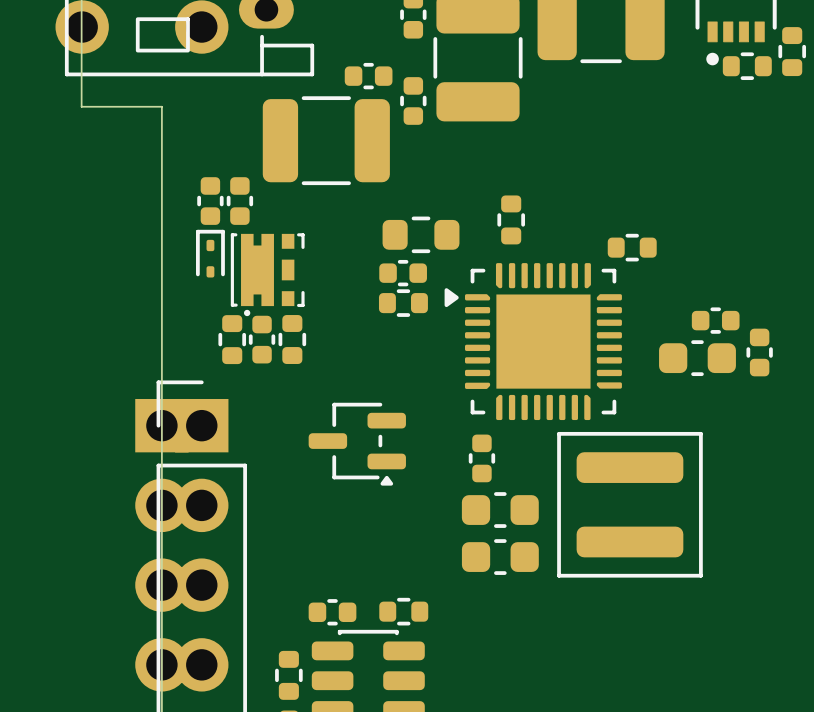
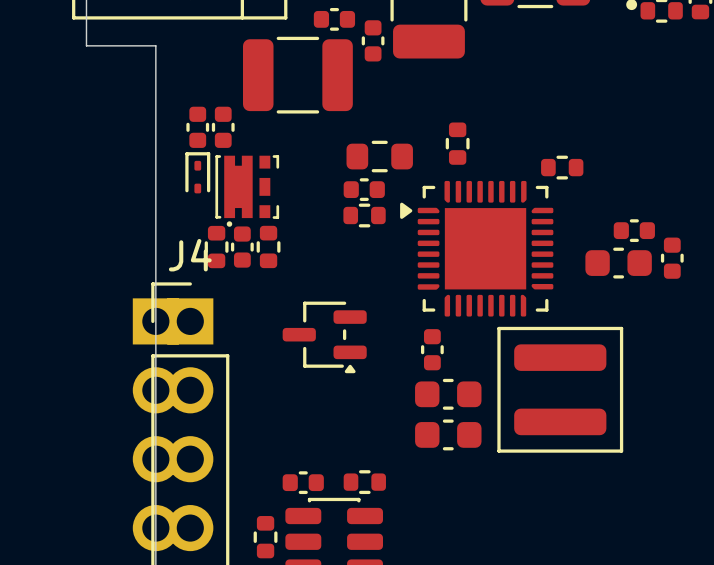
J4 name: none -> J4 (190, 255)

